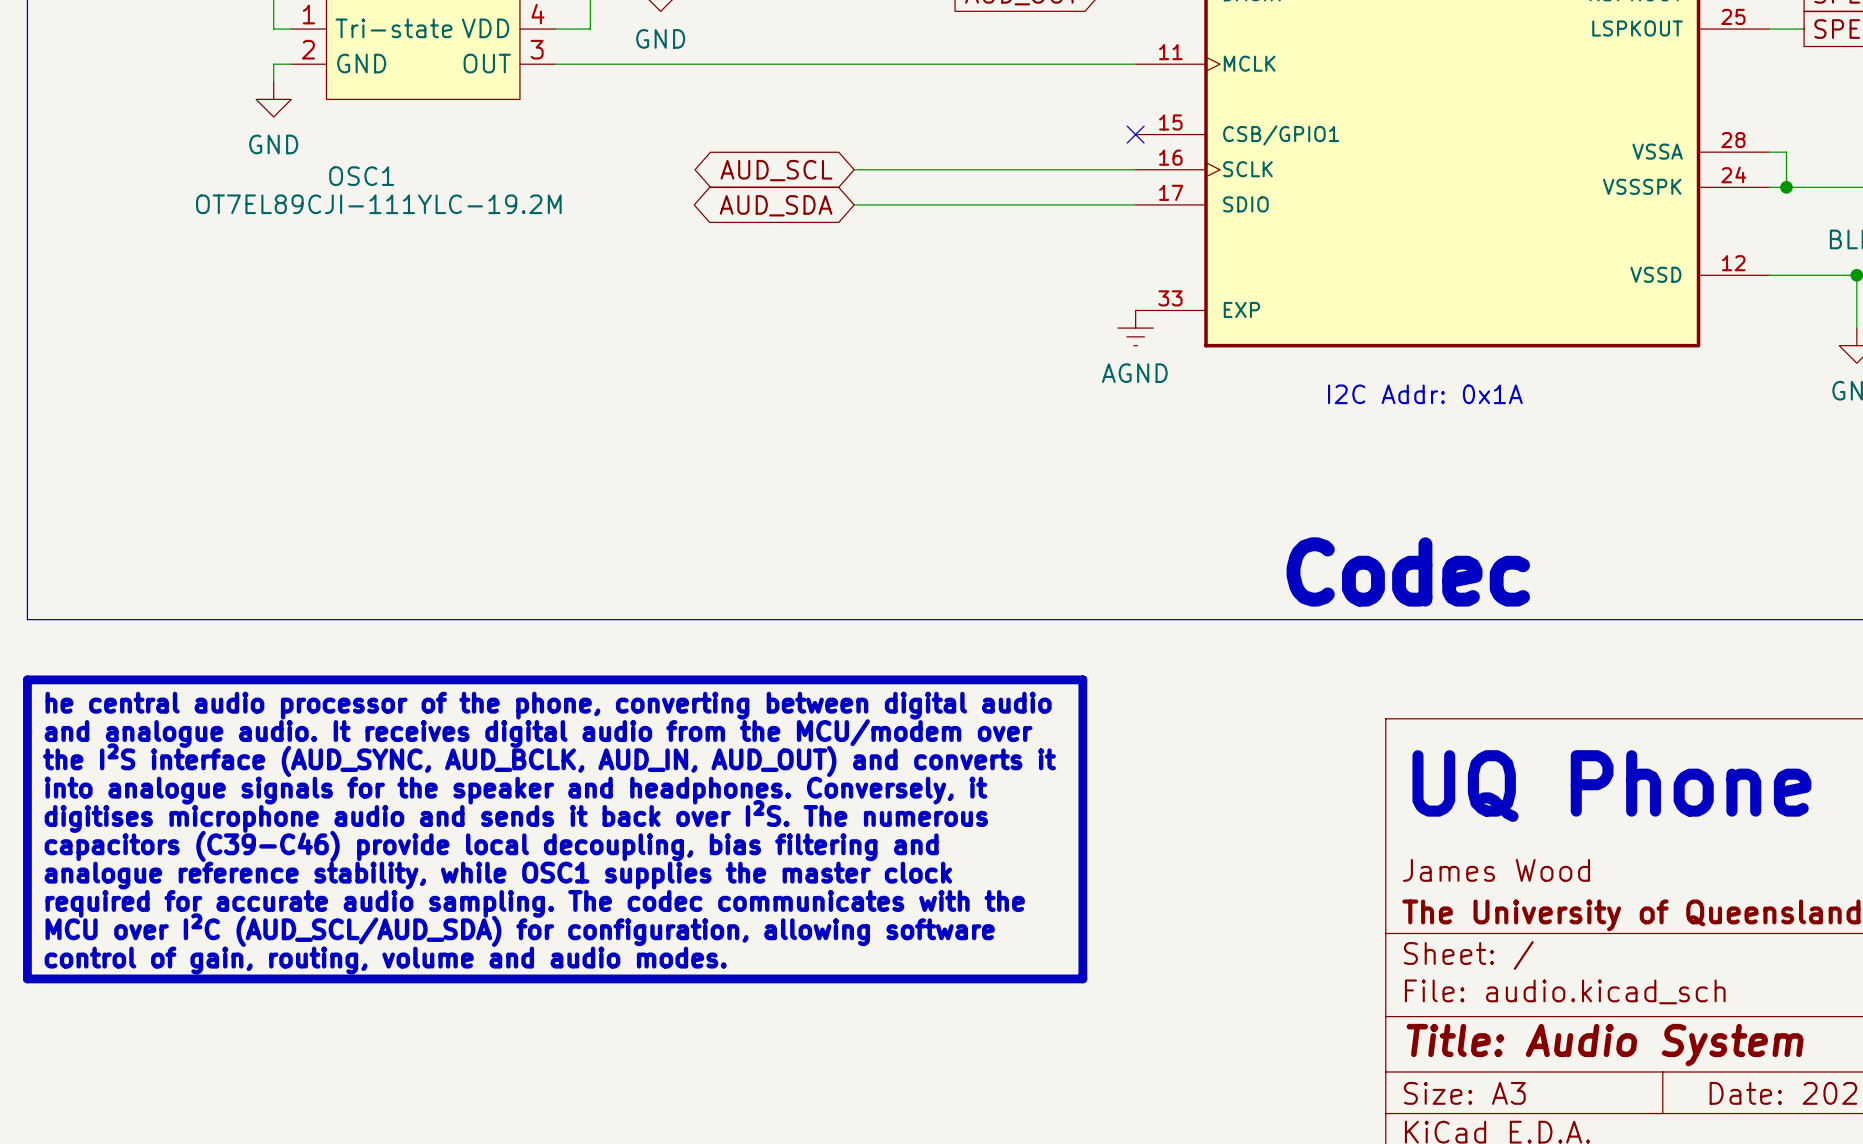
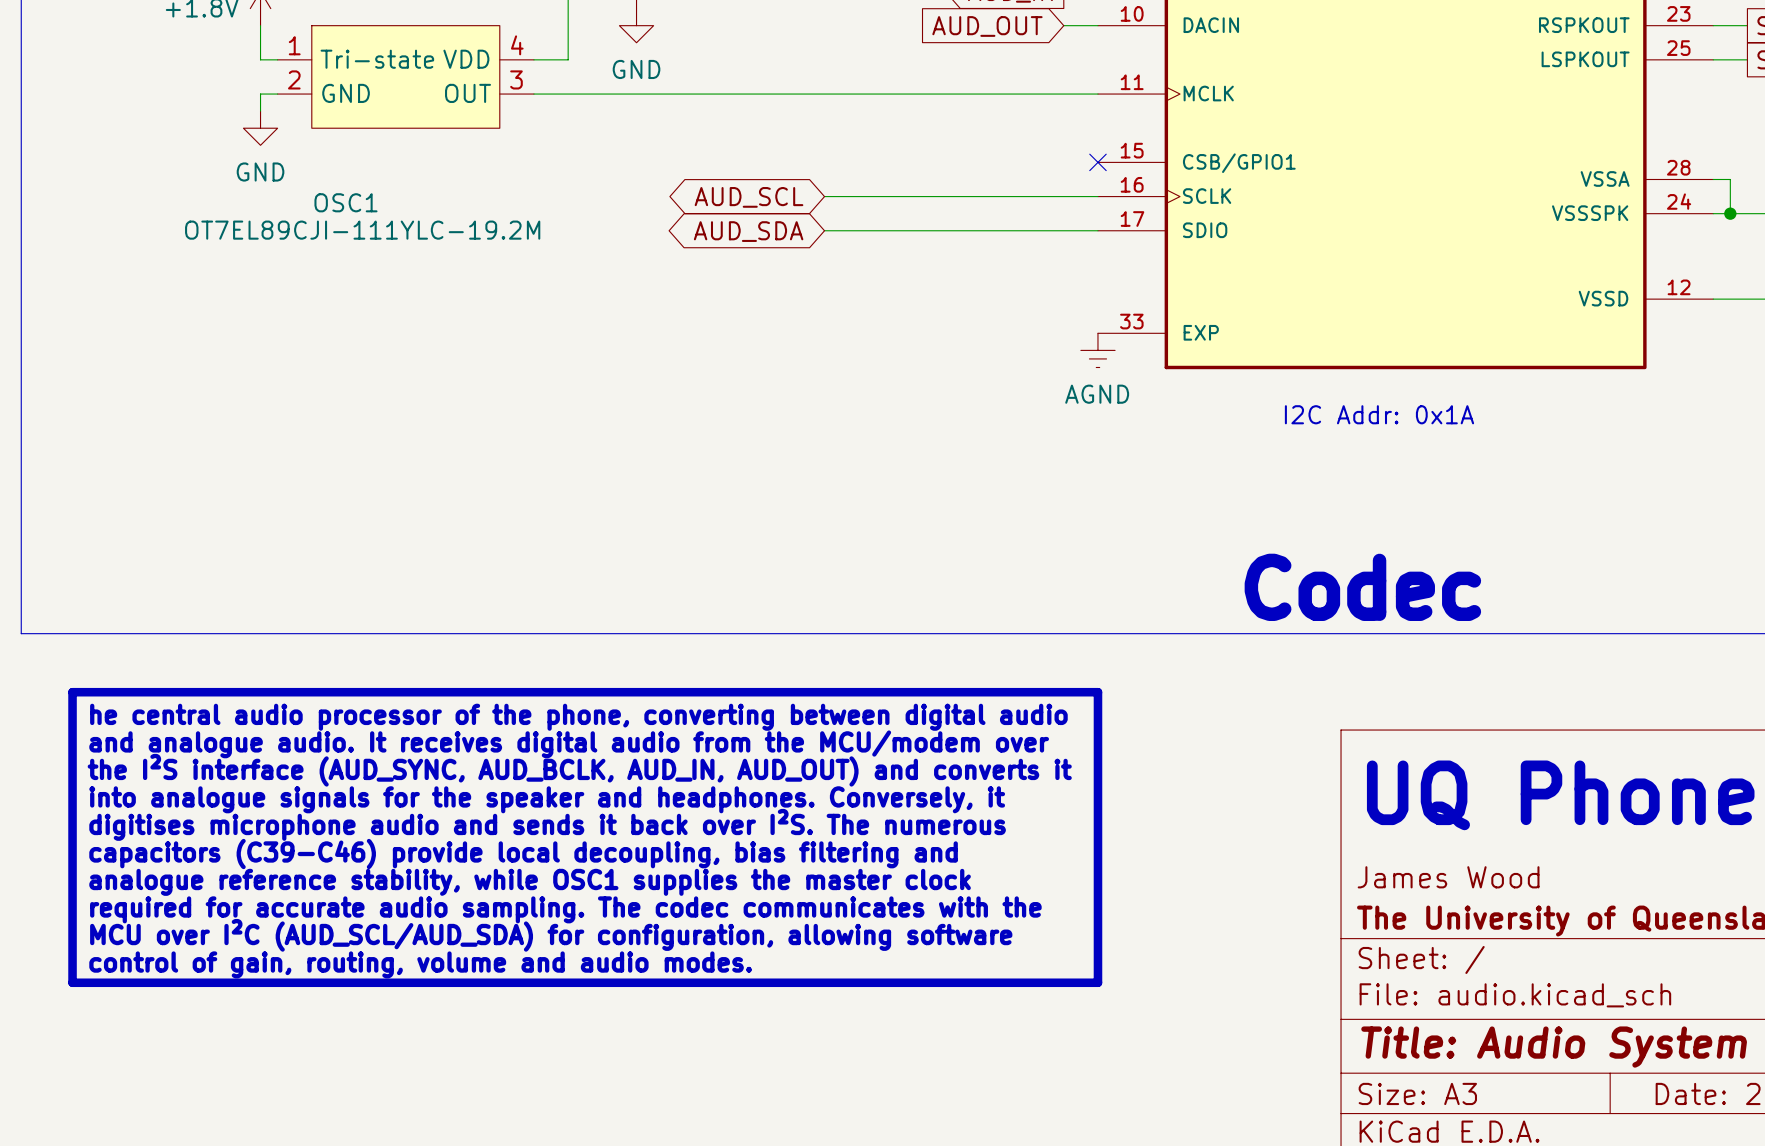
line: (80, 679) (27, 679) (27, 978) (80, 978) -> (72, 692) (72, 982)
line: (1082, 679) (1082, 978) -> (1046, 692) (1097, 692) (1097, 982) (1046, 982)
text position: he central audio processor of the phone, converting between digital audio (548, 705) -> he central audio processor of the phone, converting between digital audio (578, 717)
text position: and analogue audio. It receives digital audio from the MCU/modem over (538, 733) -> and analogue audio. It receives digital audio from the MCU/modem over (569, 744)
text position: the I²S interface (AUD_SYNC, AUD_BCLK, AUD_IN, AUD_OUT) and converts it (549, 760) -> the I²S interface (AUD_SYNC, AUD_BCLK, AUD_IN, AUD_OUT) and converts it (579, 770)
text position: into analogue signals for the speaker and headphones. Conversely, it (515, 790) -> into analogue signals for the speaker and headphones. Conversely, it (547, 799)
text position: digitises microphone audio and sends it back over I²S. The numerous (516, 816) -> digitises microphone audio and sends it back over I²S. The numerous (547, 824)
text position: capacitors (C39-C46) provide local decoupling, bias filtering and (491, 846) -> capacitors (C39-C46) provide local decoupling, bias filtering and (523, 854)
text position: analogue reference stability, while OSC1 supplies the master clock (498, 875) -> analogue reference stability, while OSC1 supplies the master clock (530, 882)
text position: required for accurate audio sampling. The codec communicates with the (535, 903) -> required for accurate audio sampling. The codec communicates with the (565, 909)
text position: MCU over I²C (AUD_SCL/AUD_SDA) for configuration, allowing software (520, 930) -> MCU over I²C (AUD_SCL/AUD_SDA) for configuration, allowing software (551, 935)
text position: control of gain, routing, volume and audio modes. (385, 960) -> control of gain, routing, volume and audio modes. (420, 964)

